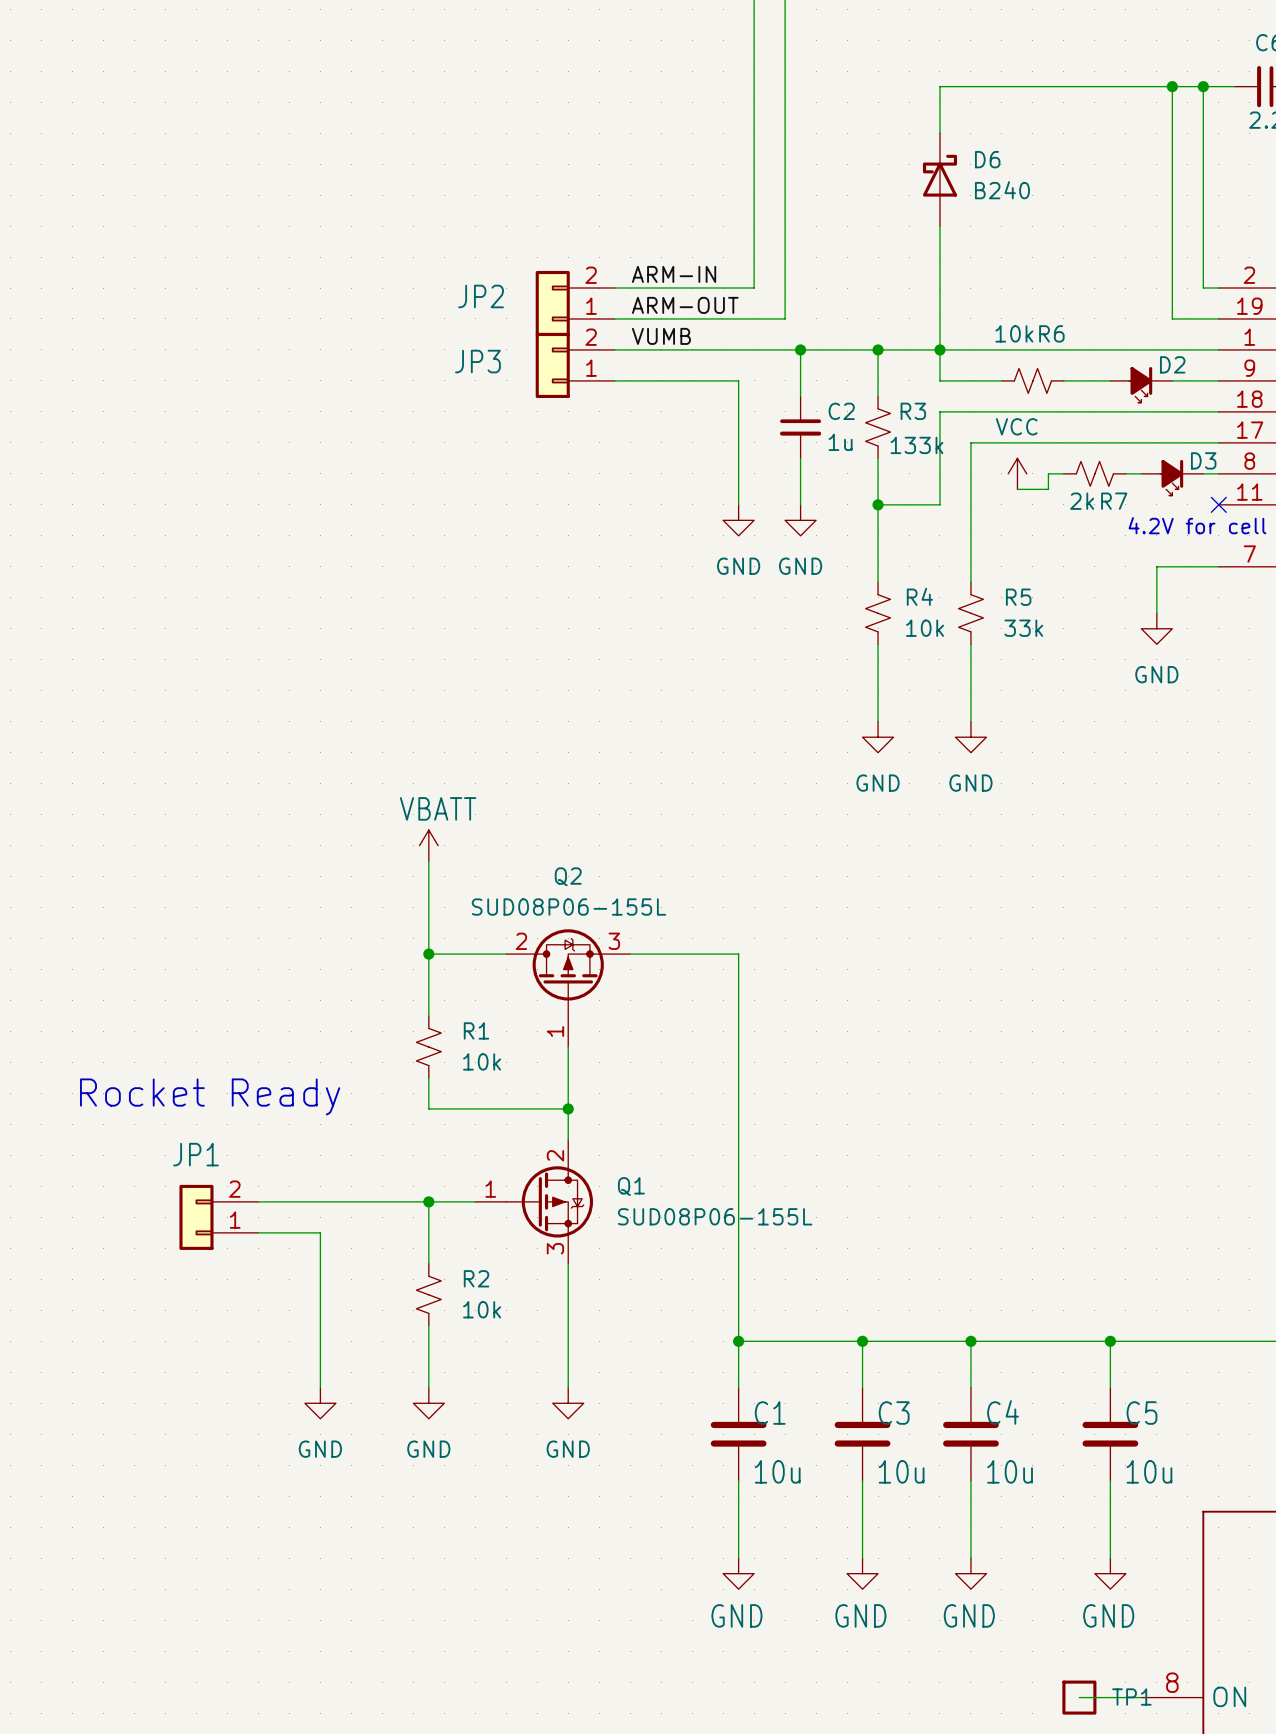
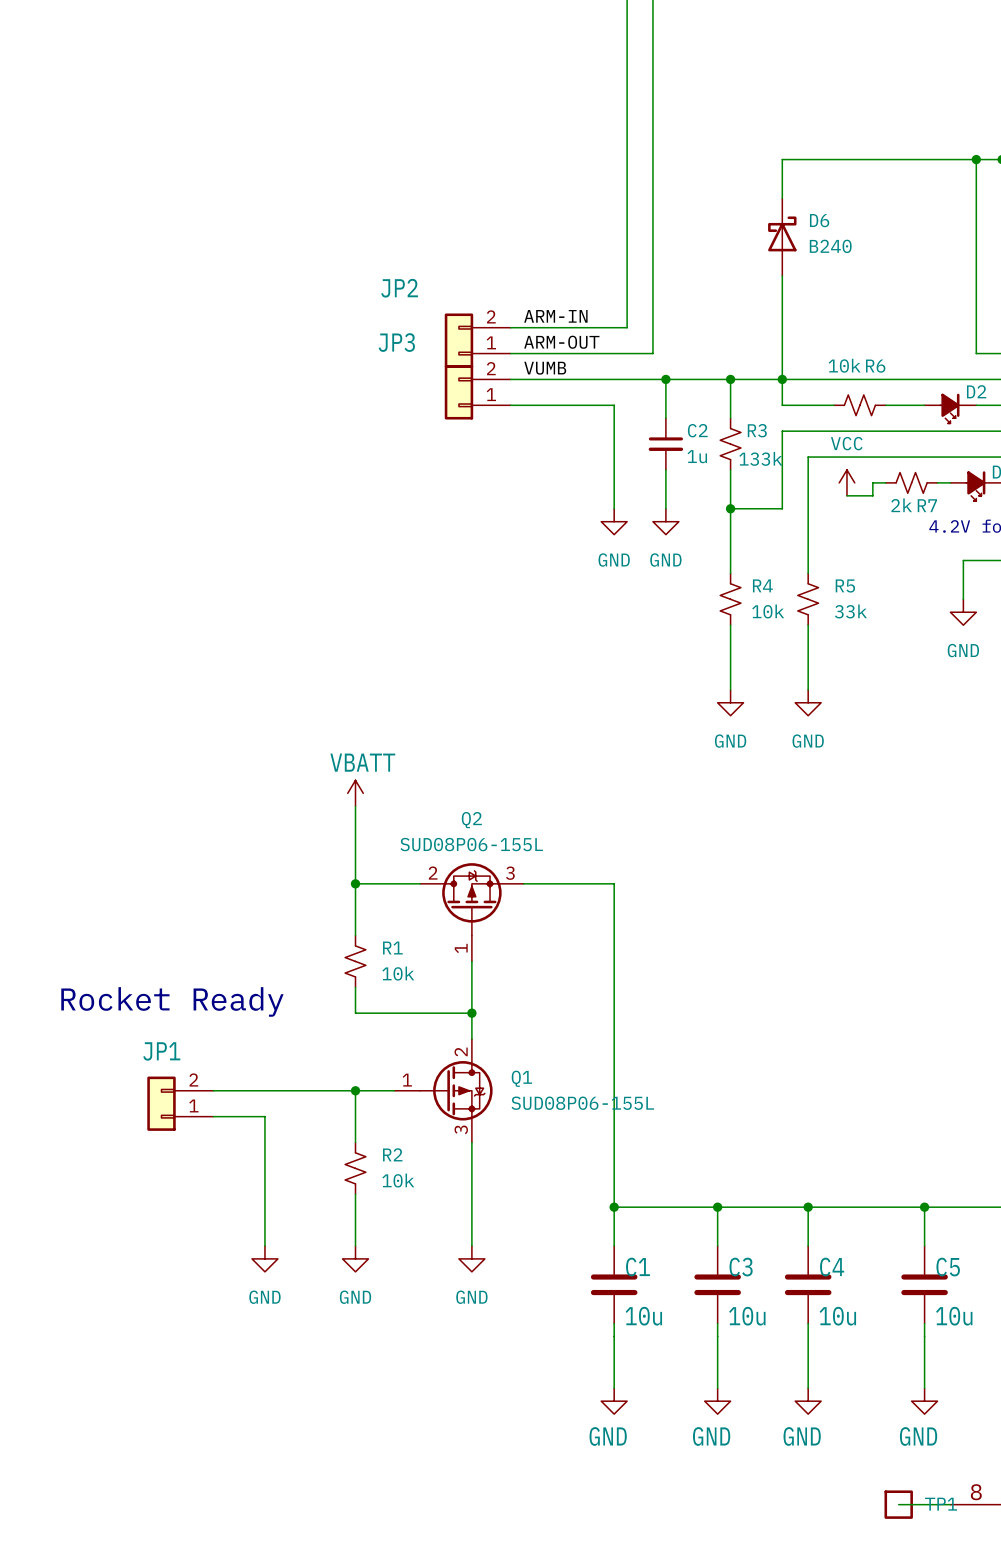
JP2 name position: JP2 (481, 296) -> JP2 (399, 288)
JP3 name position: JP3 (477, 361) -> JP3 (396, 342)

